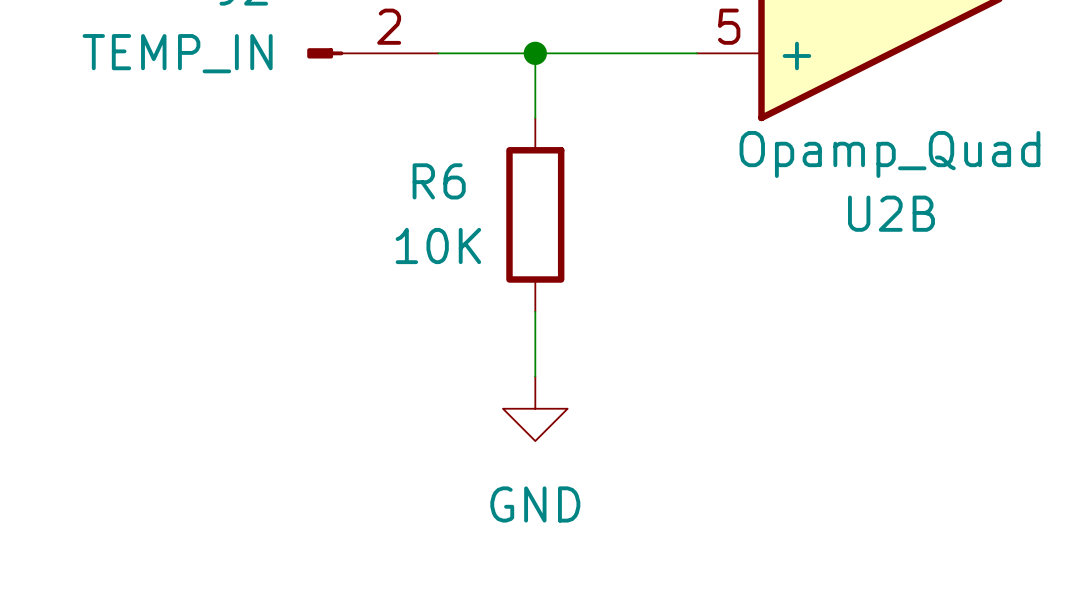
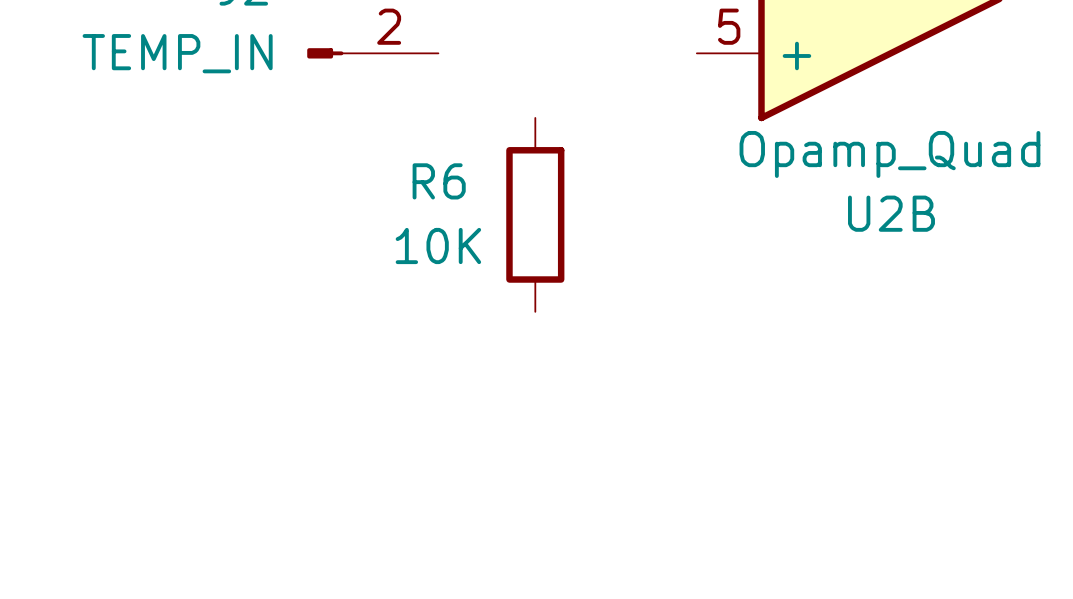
wire: (438, 53) (696, 53) -> none
wire: (535, 53) (535, 117) -> none
junction: (535, 53) -> none
wire: (535, 311) (535, 376) -> none
power symbol: GND (535, 408) -> none

